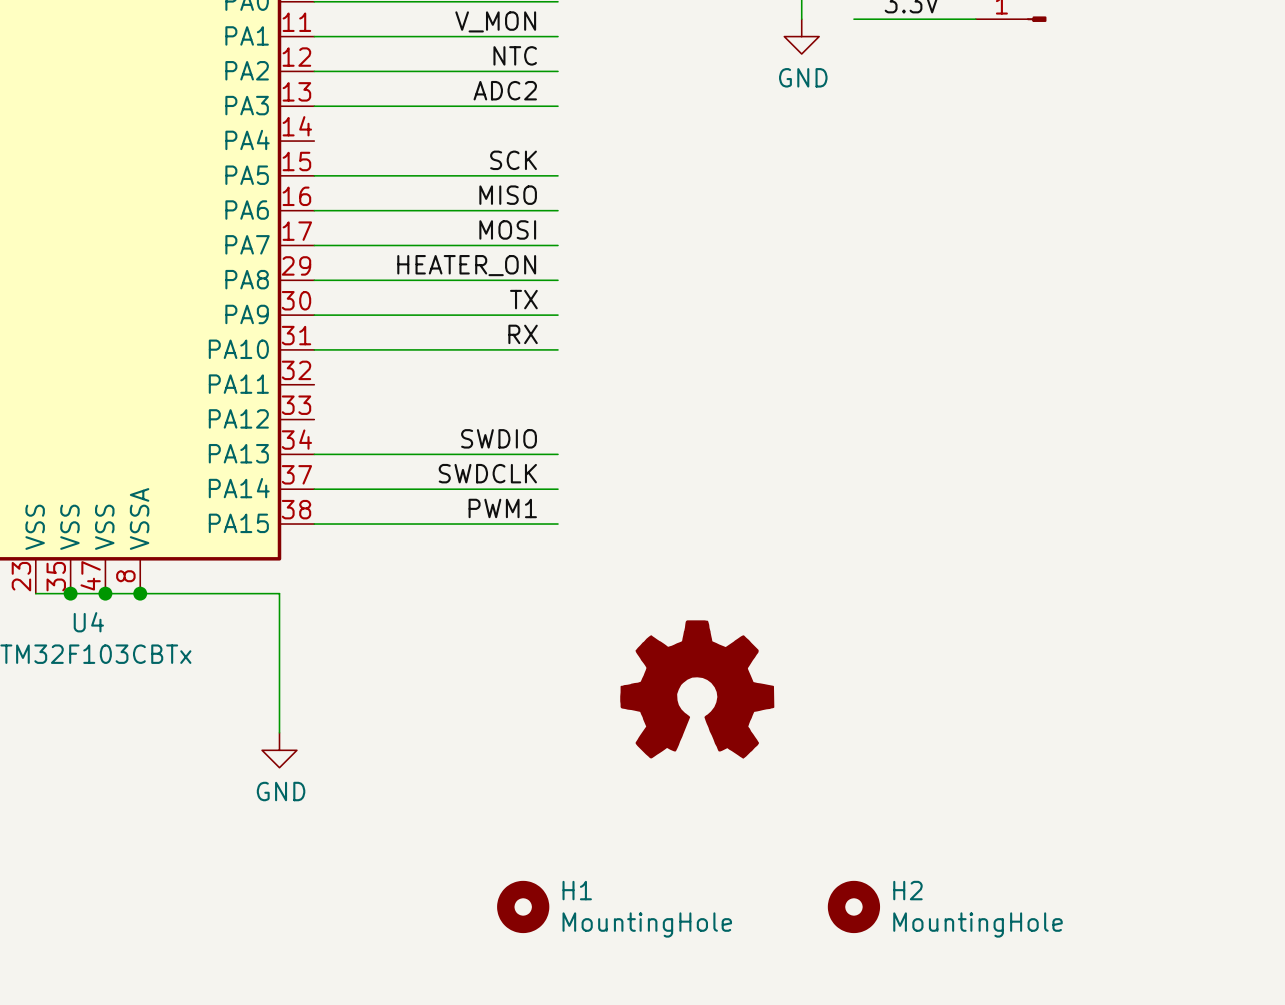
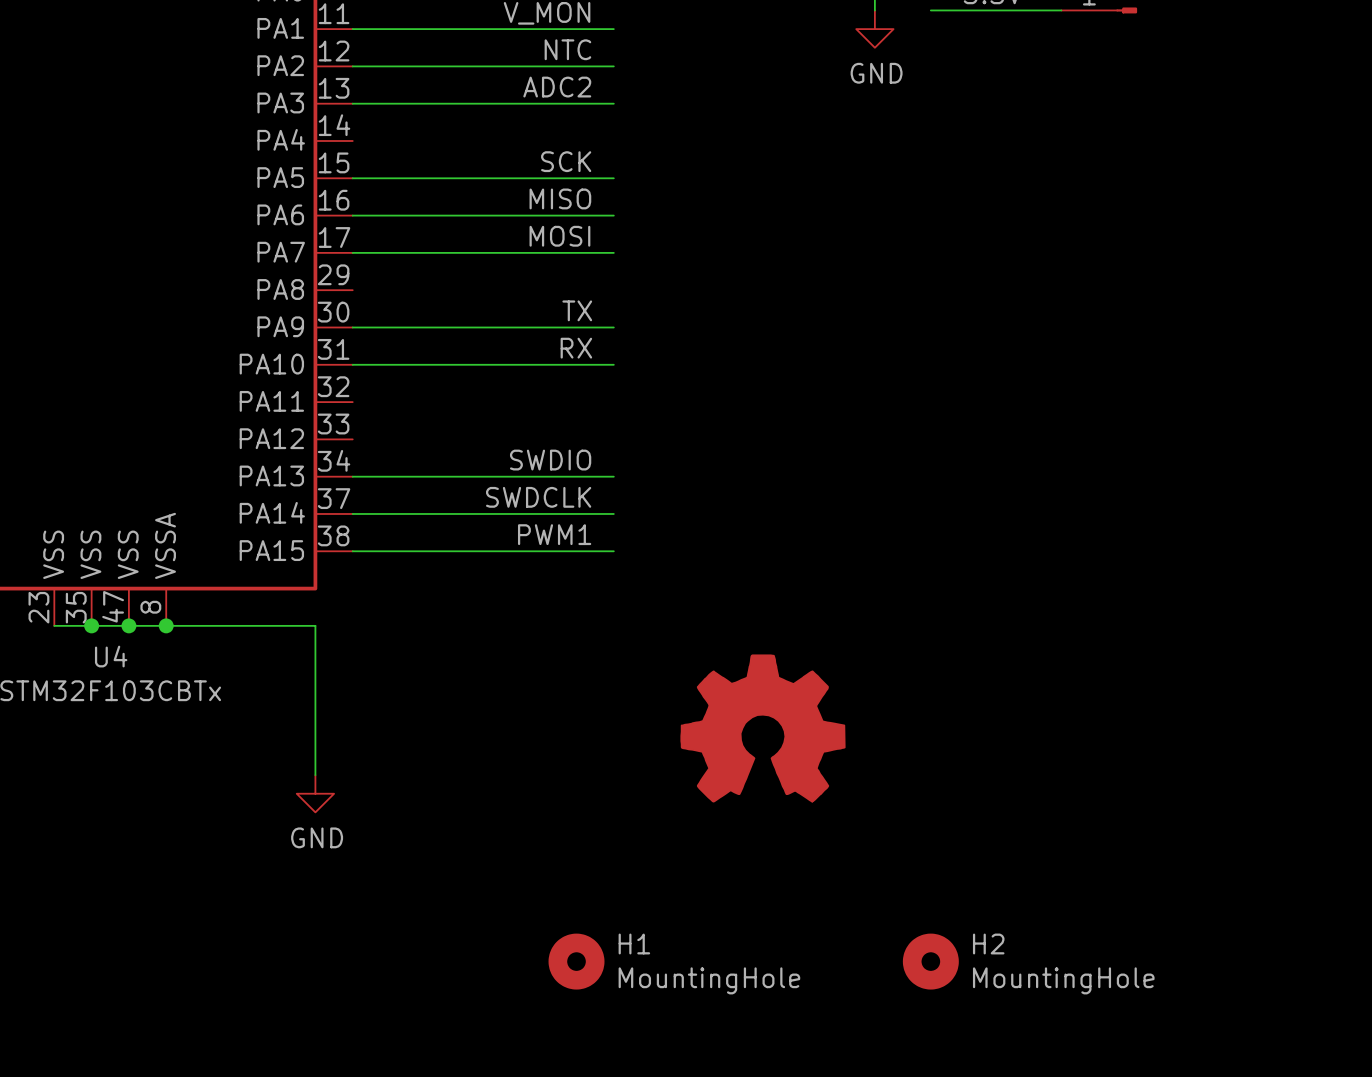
label: HEATER_ON (466, 265) -> none
wire: (314, 280) (558, 280) -> none

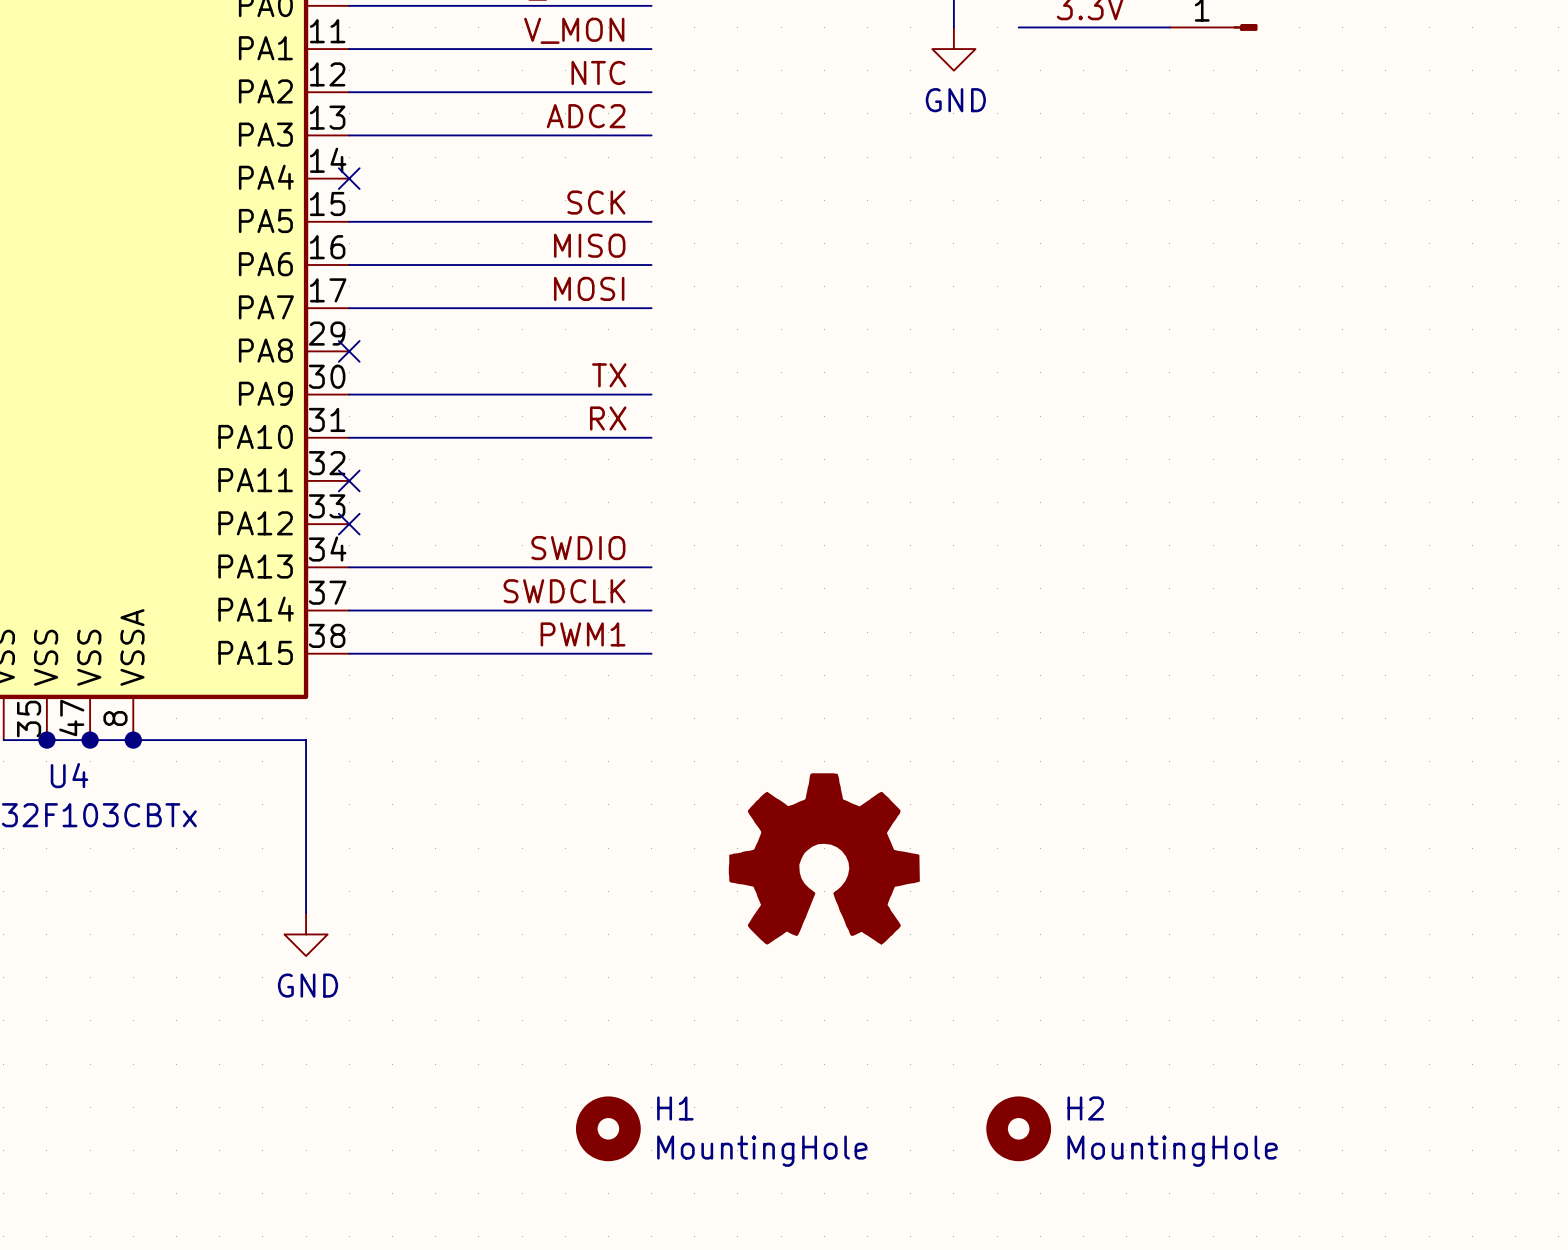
no-connect mark: none -> (349, 178)
no-connect mark: none -> (349, 351)
no-connect mark: none -> (349, 480)
no-connect mark: none -> (349, 524)

